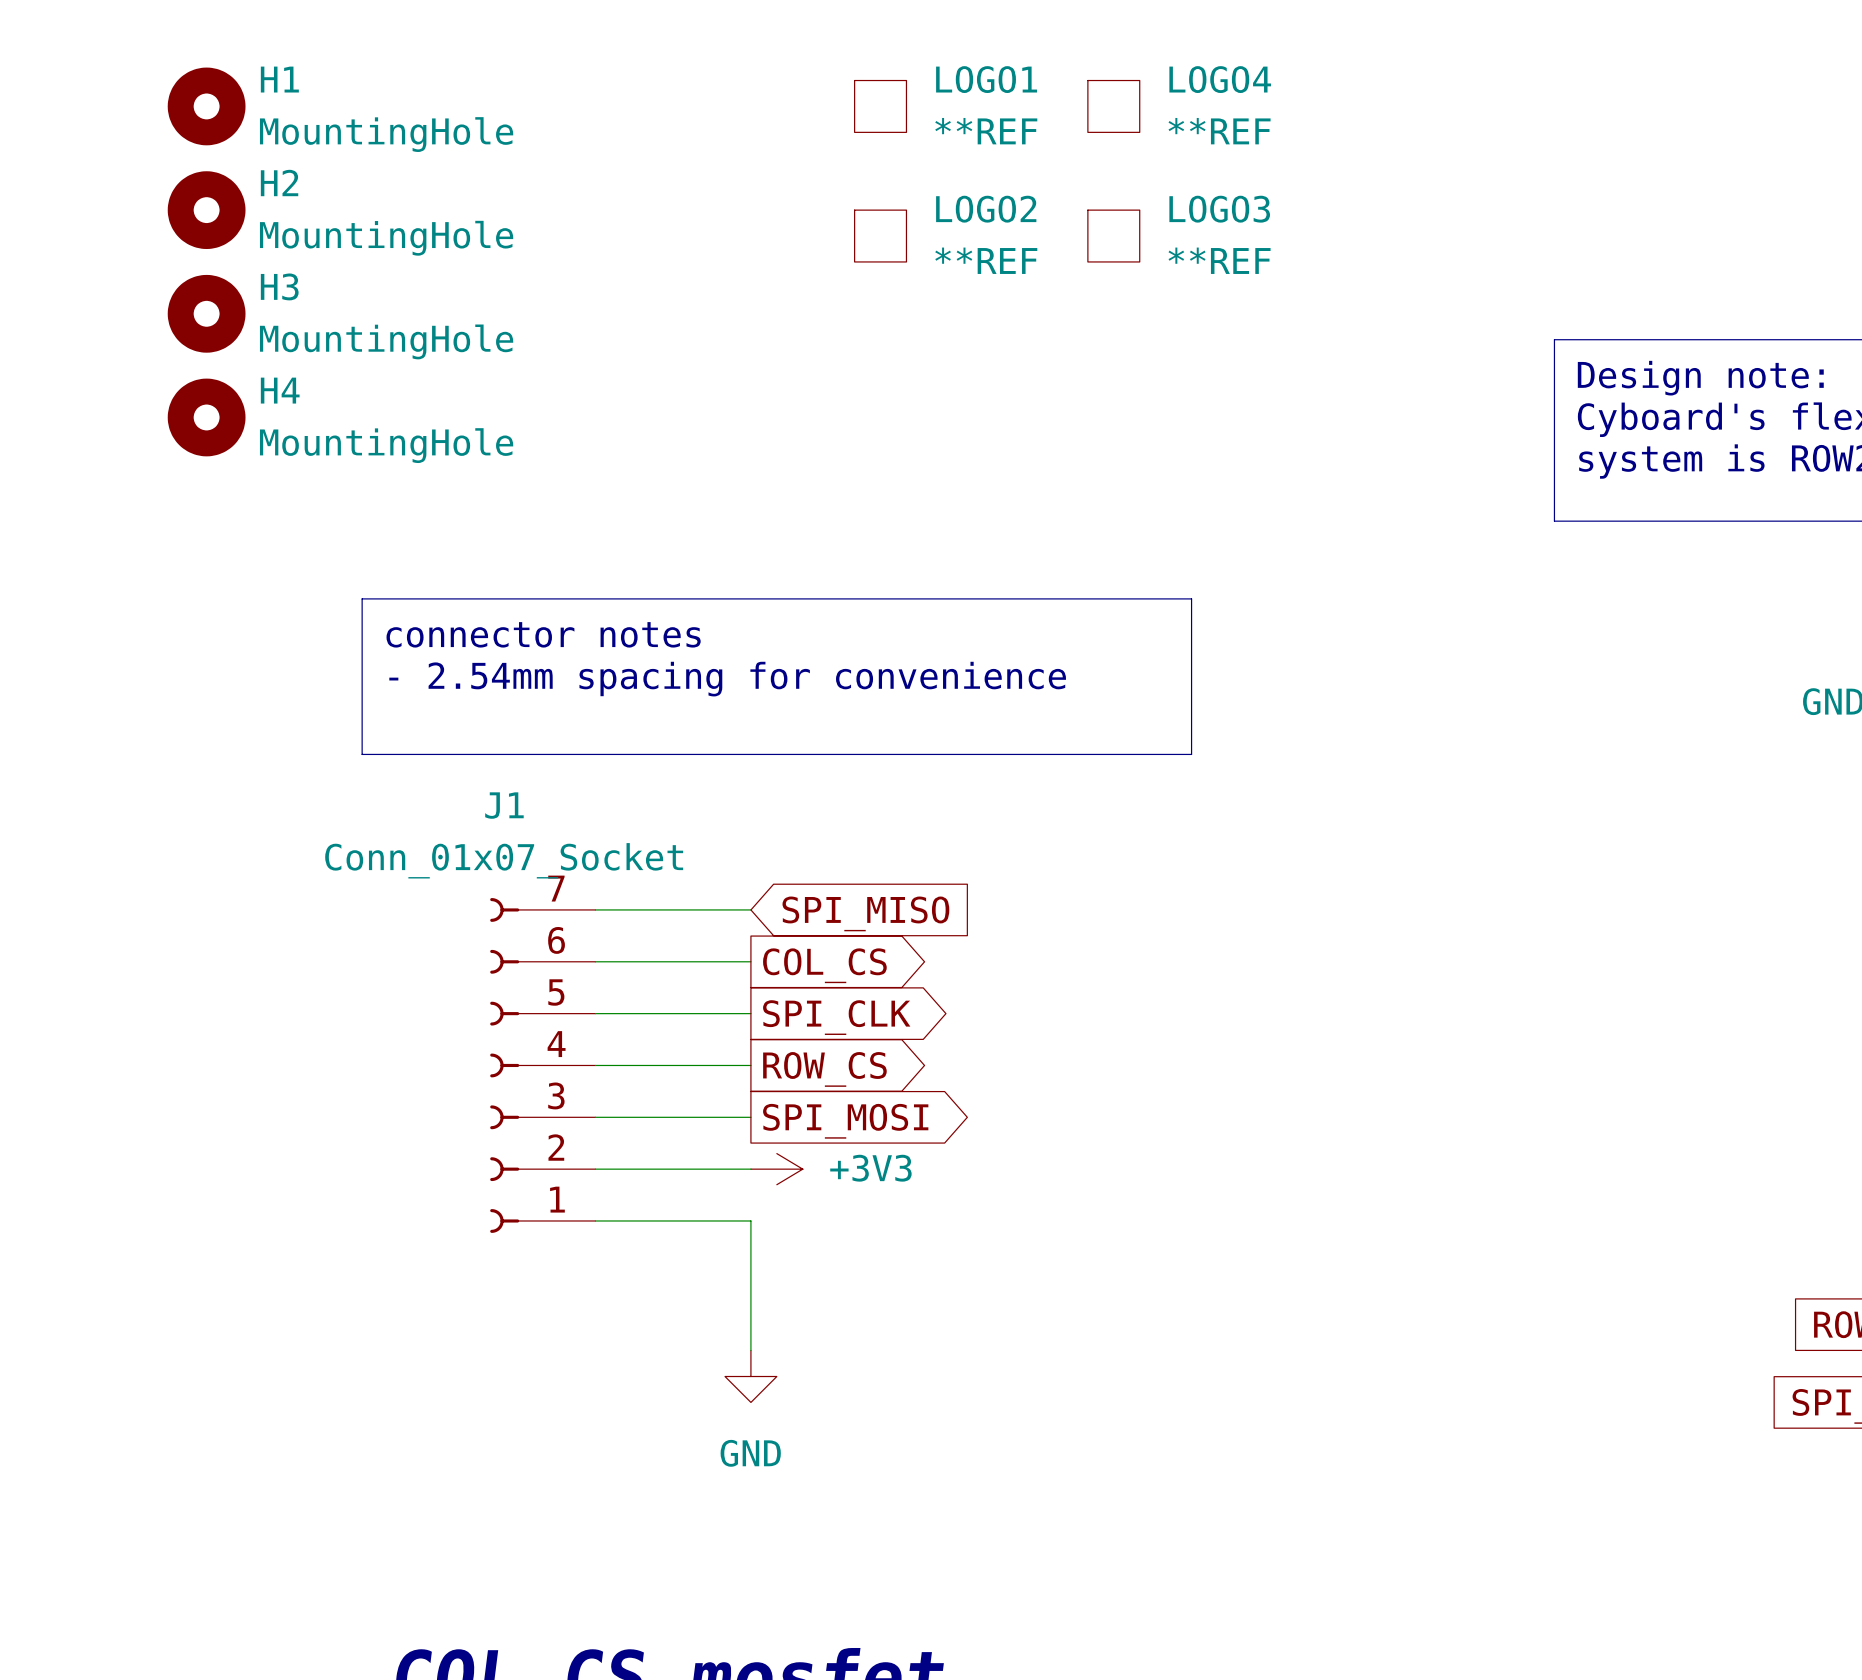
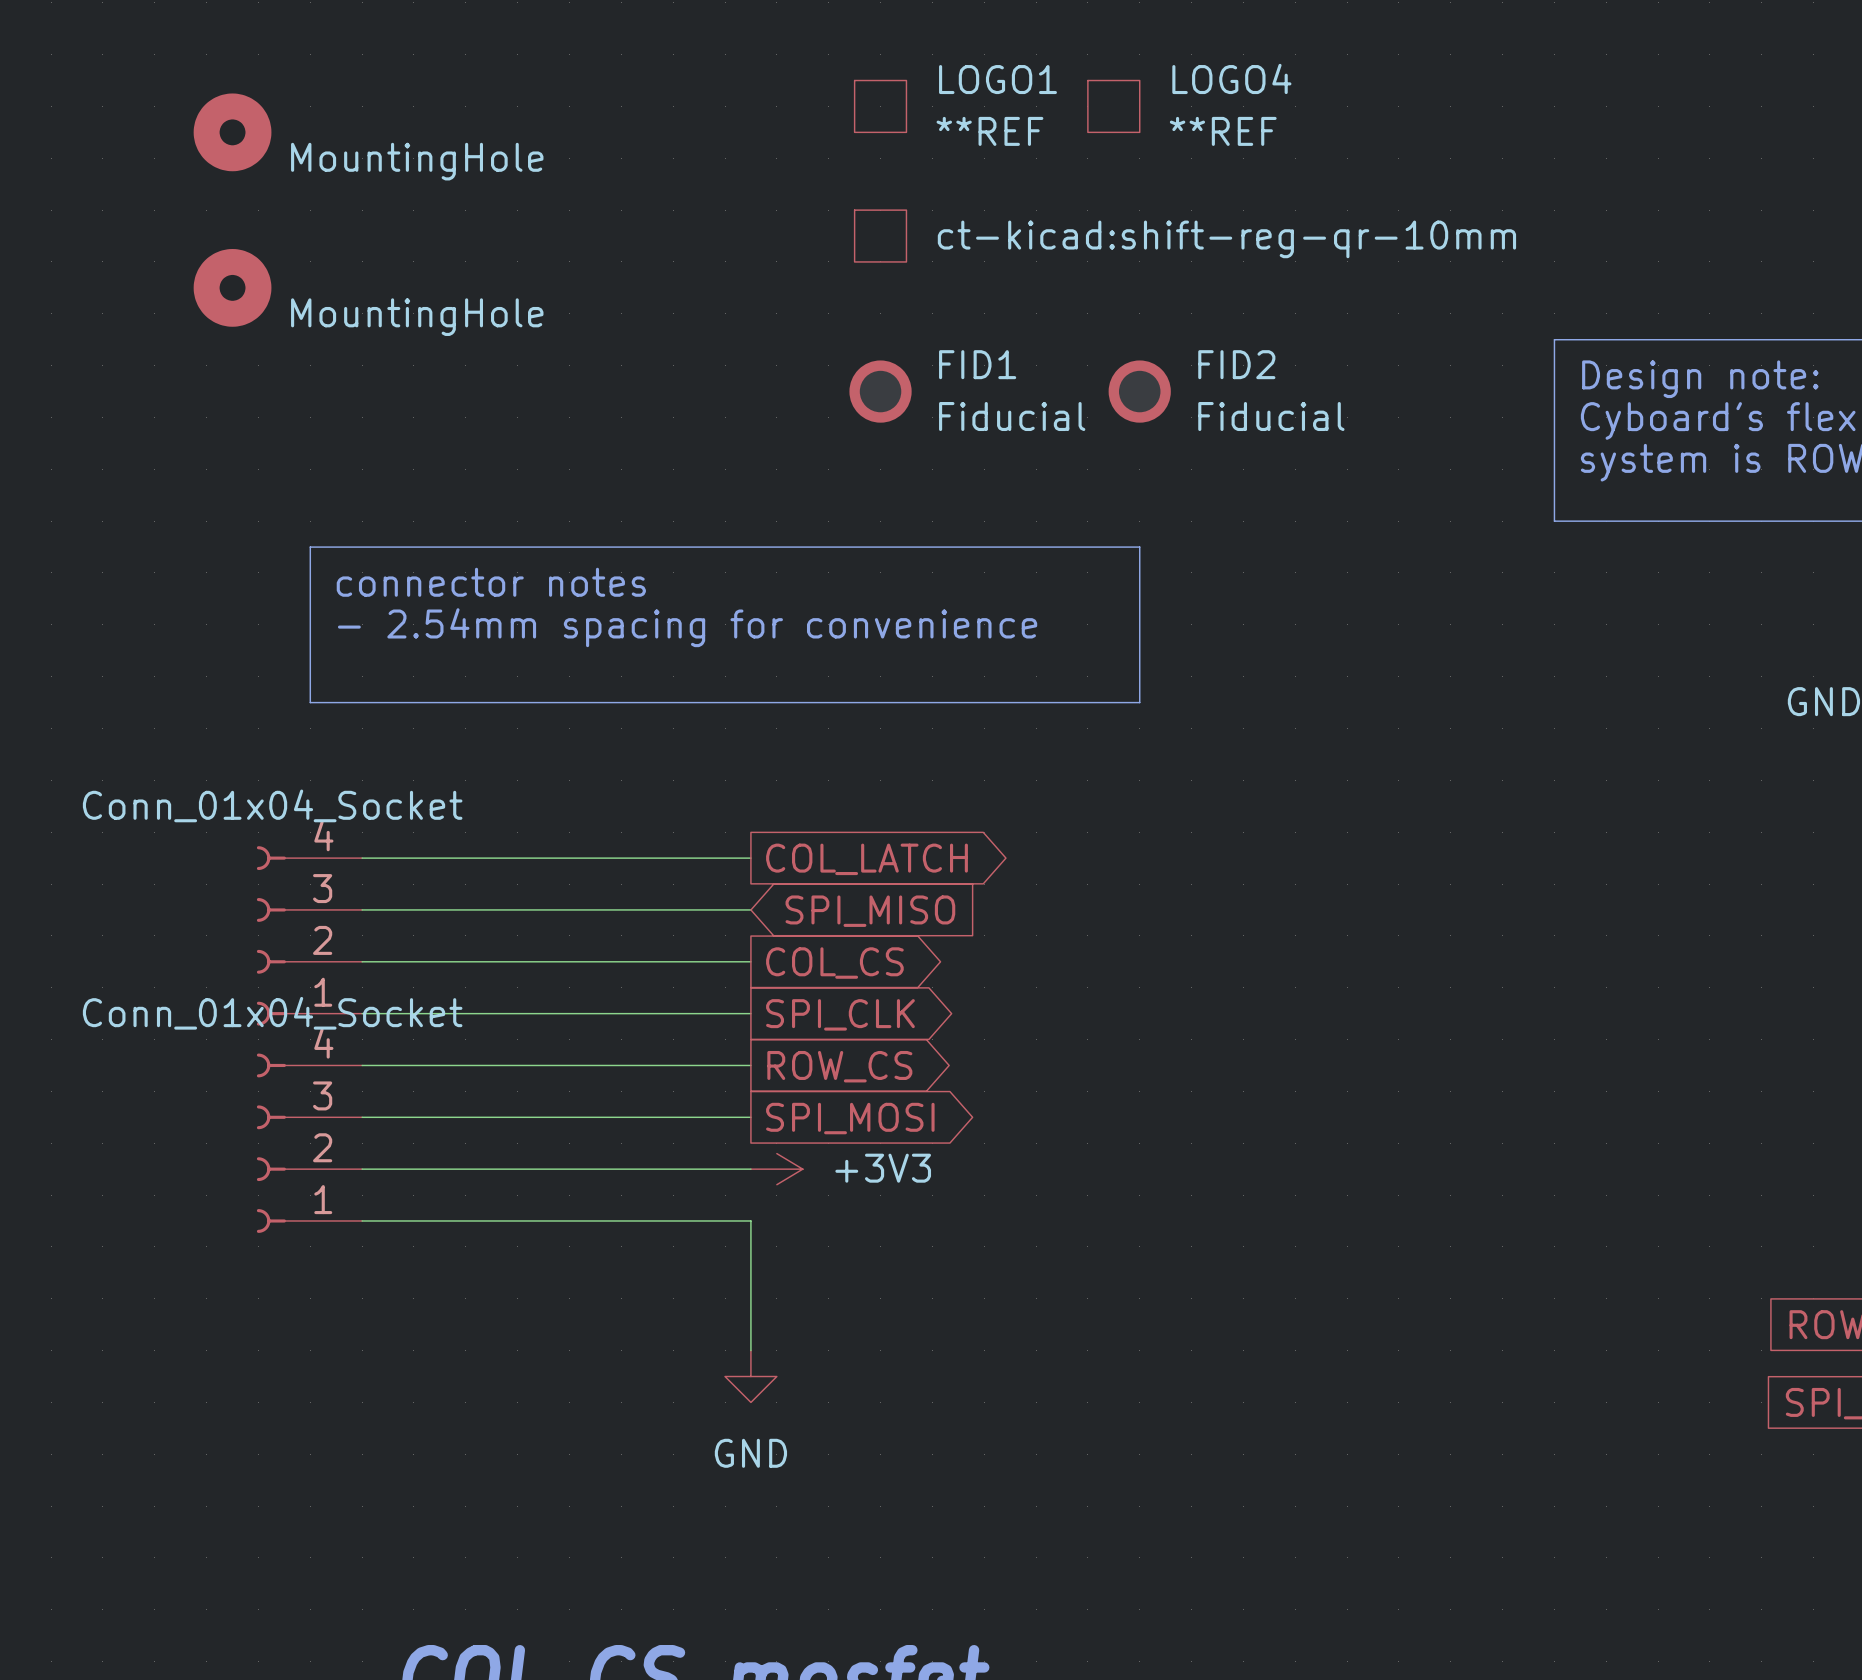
H1: MountingHole (206, 106) -> none
part: none -> MountingHole (232, 132)
LOGO2 name: LOGO2 (986, 209) -> none
H2: MountingHole (206, 210) -> none
LOGO3: **REF (1113, 236) -> none
LOGO2 text: none -> ct-kicad:shift-reg-qr-10mm (1226, 239)
LOGO2 value: **REF (986, 260) -> none
part: none -> MountingHole (232, 287)
H3: MountingHole (206, 313) -> none
FID1: none -> Fiducial (880, 391)
FID2: none -> Fiducial (1139, 391)
H4: MountingHole (206, 417) -> none
line: (362, 598) (1191, 598) (1191, 754) (362, 754) (362, 598) -> (310, 547) (1139, 547) (1139, 702) (310, 702) (310, 547)
text position: connector notes (543, 634) -> connector notes (491, 582)
text position: - 2.54mm spacing for convenience (727, 679) -> - 2.54mm spacing for convenience (687, 627)
wire: none -> (362, 858) (750, 858)
global label: none -> COL_LATCH (867, 859)
wire: none -> (362, 909) (595, 909)
part: none -> Conn_01x04_Socket (309, 935)
wire: none -> (362, 961) (595, 961)
wire: none -> (362, 1013) (595, 1013)
wire: none -> (362, 1065) (595, 1065)
J1: Conn_01x07_Socket (542, 1065) -> none
wire: none -> (362, 1117) (595, 1117)
part: none -> Conn_01x04_Socket (309, 1143)
wire: none -> (362, 1169) (595, 1169)
wire: none -> (362, 1220) (595, 1220)

